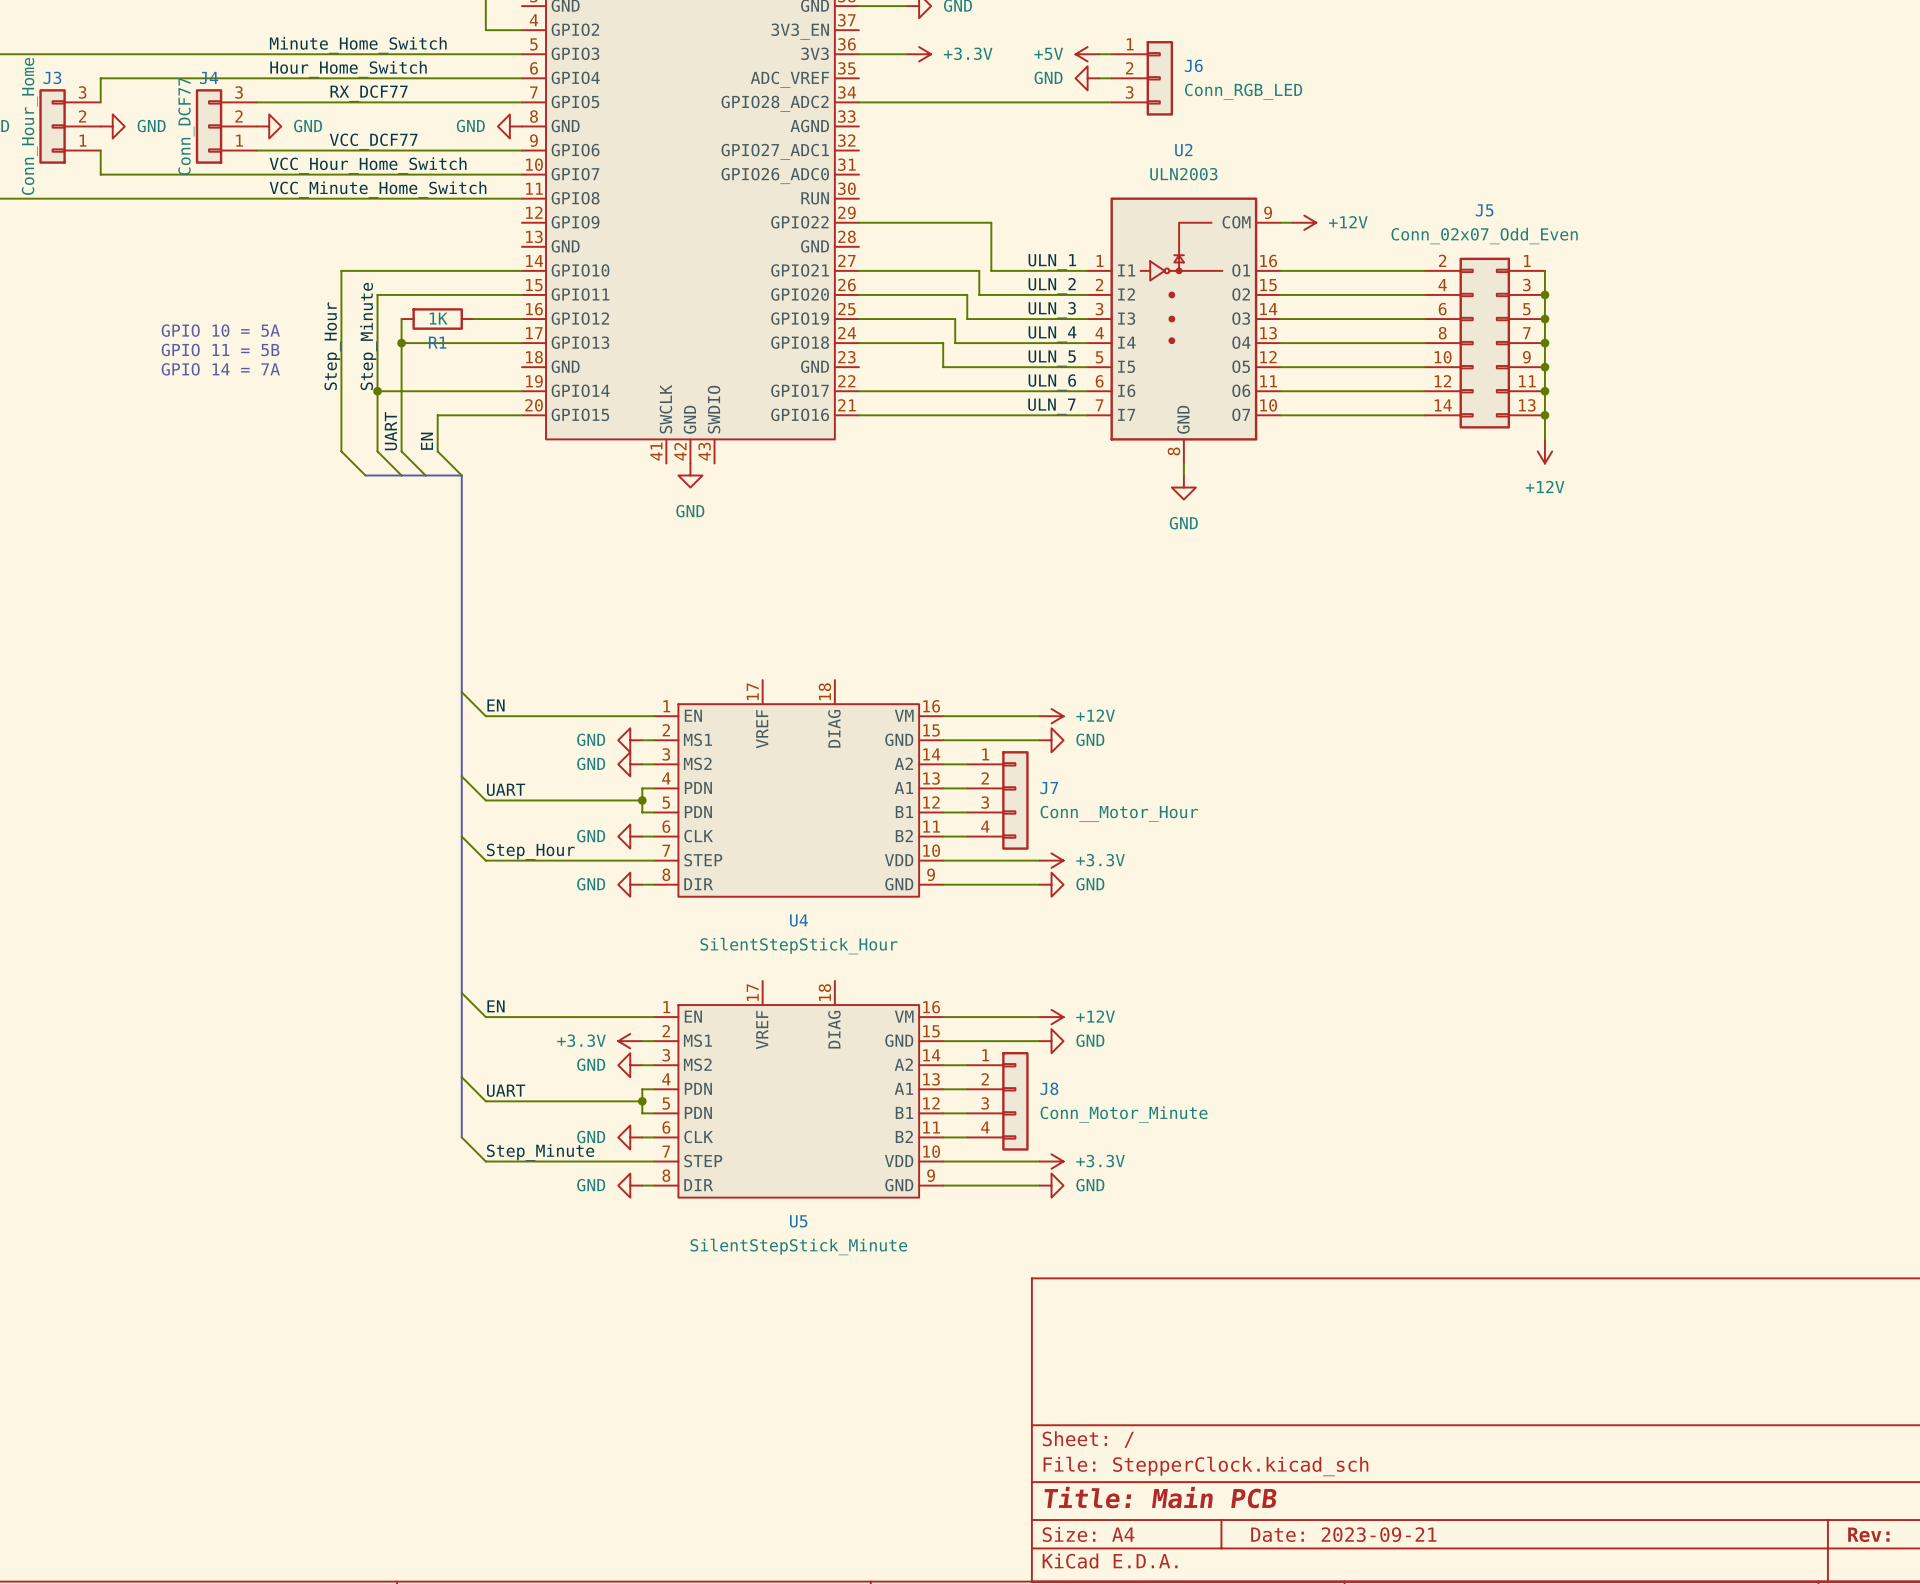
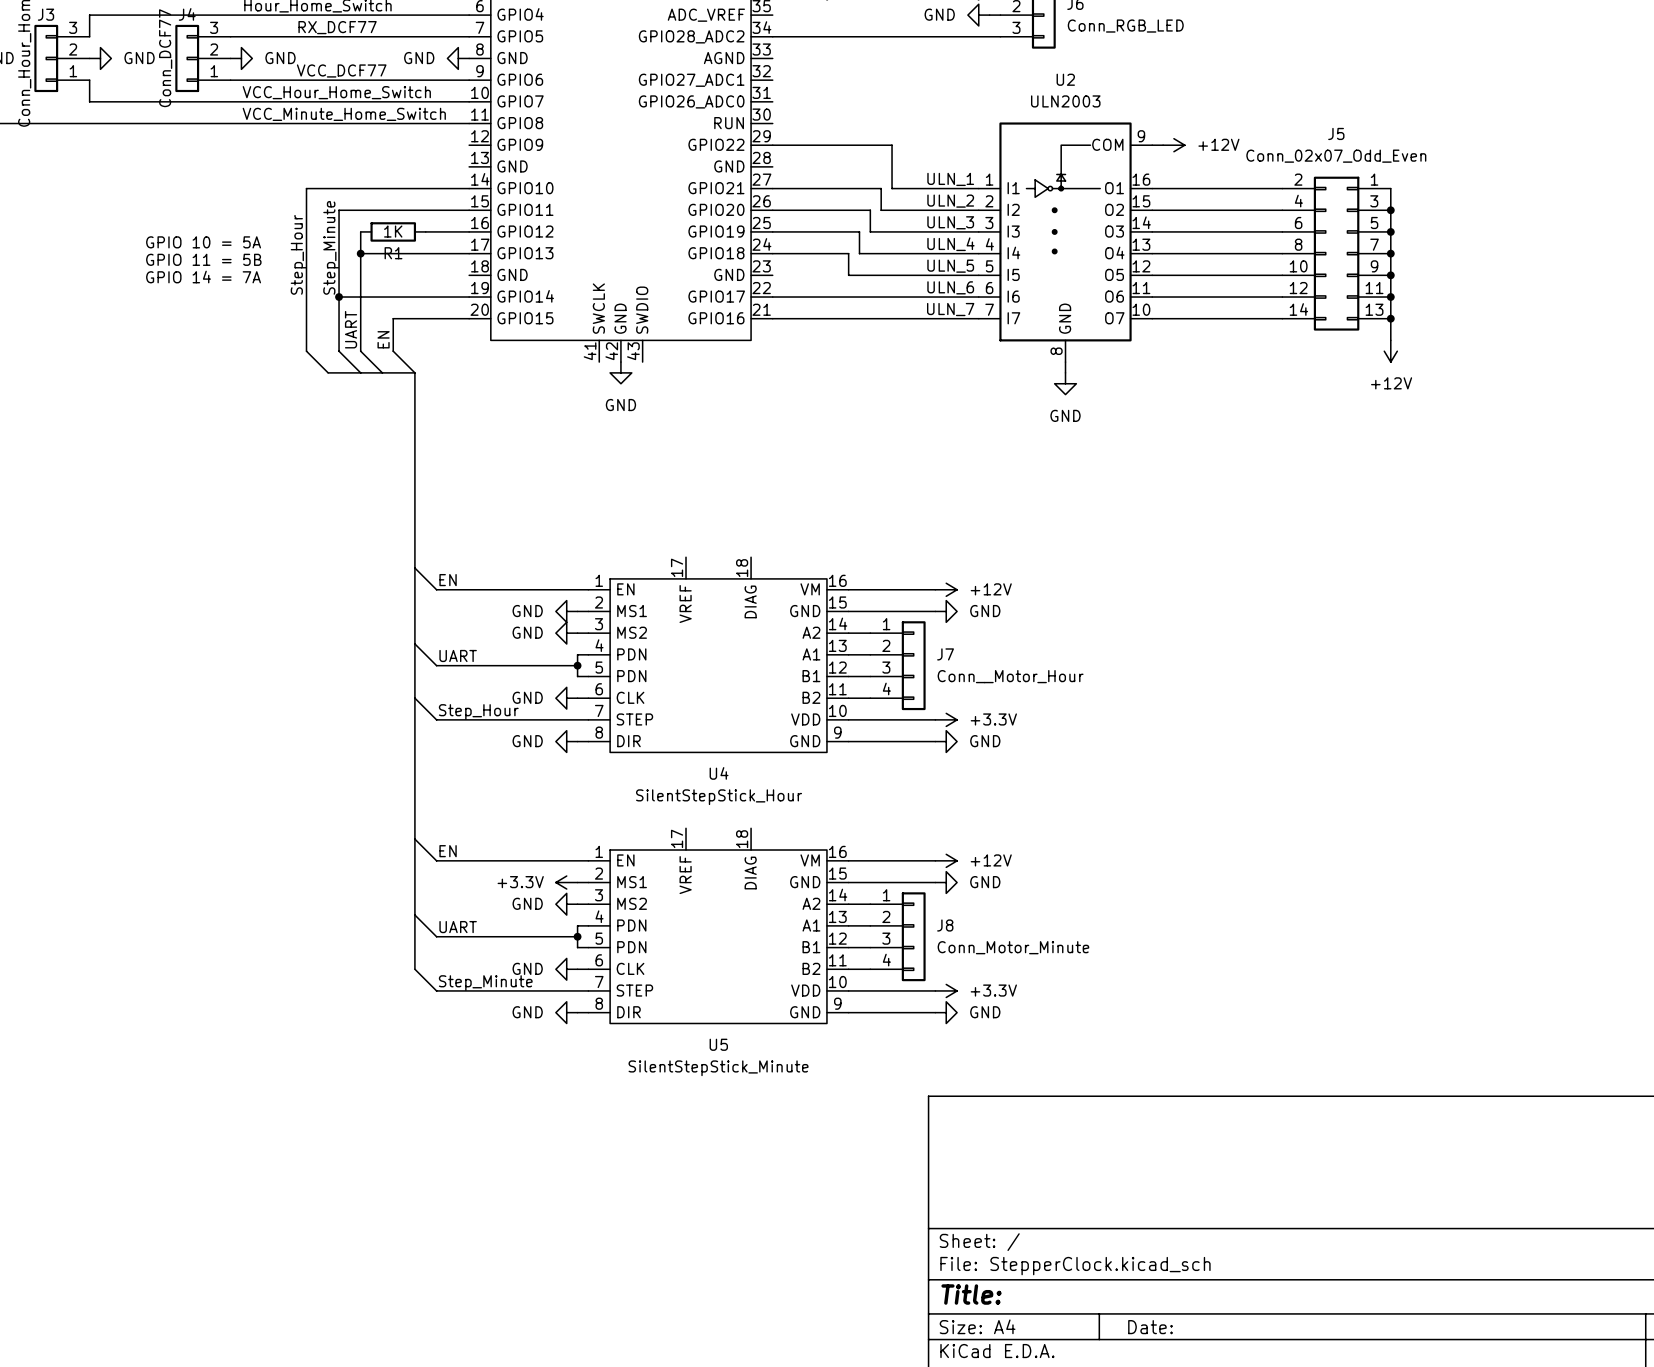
title block: Title: Main PCB (1160, 1497) -> Title: (971, 1294)
title block: Date: 2023-09-21 (1343, 1534) -> Date: (1150, 1327)

